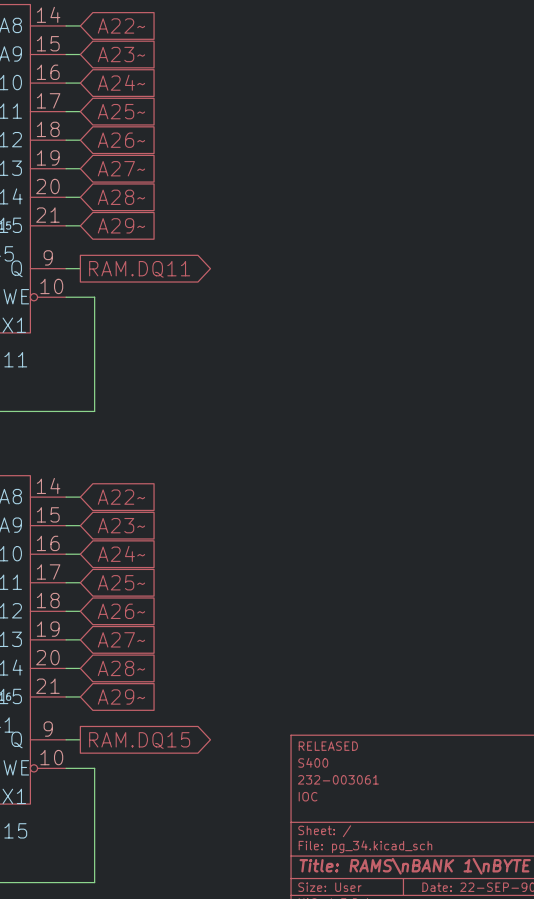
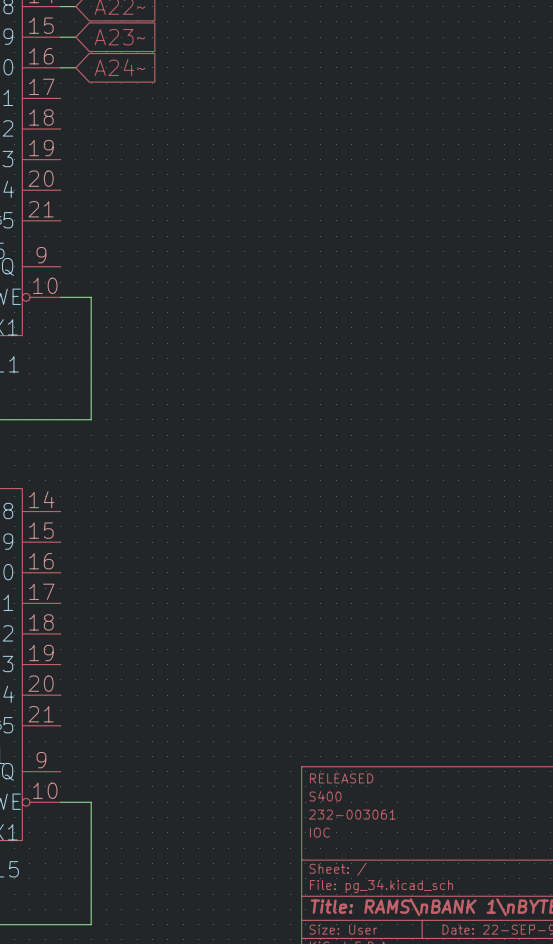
wire: (66, 111) (80, 111) -> none
global label: A25~ (121, 111) -> none
wire: (66, 140) (80, 140) -> none
global label: A26~ (121, 140) -> none
wire: (66, 168) (80, 168) -> none
global label: A27~ (121, 168) -> none
wire: (66, 197) (80, 197) -> none
global label: A28~ (121, 197) -> none
wire: (66, 225) (80, 225) -> none
global label: A29~ (121, 225) -> none
wire: (66, 268) (80, 268) -> none
global label: RAM.DQ11 (139, 269) -> none
wire: (66, 497) (80, 497) -> none
global label: A22~ (121, 497) -> none
wire: (66, 525) (80, 525) -> none
global label: A23~ (121, 525) -> none
global label: A24~ (121, 553) -> none
wire: (66, 554) (80, 554) -> none
wire: (66, 582) (80, 582) -> none
global label: A25~ (121, 582) -> none
wire: (66, 611) (80, 611) -> none
global label: A26~ (121, 611) -> none
wire: (66, 639) (80, 639) -> none
global label: A27~ (121, 639) -> none
wire: (66, 668) (80, 668) -> none
global label: A28~ (121, 668) -> none
wire: (66, 696) (80, 696) -> none
global label: A29~ (121, 696) -> none
wire: (66, 739) (80, 739) -> none
global label: RAM.DQ15 (139, 740) -> none

